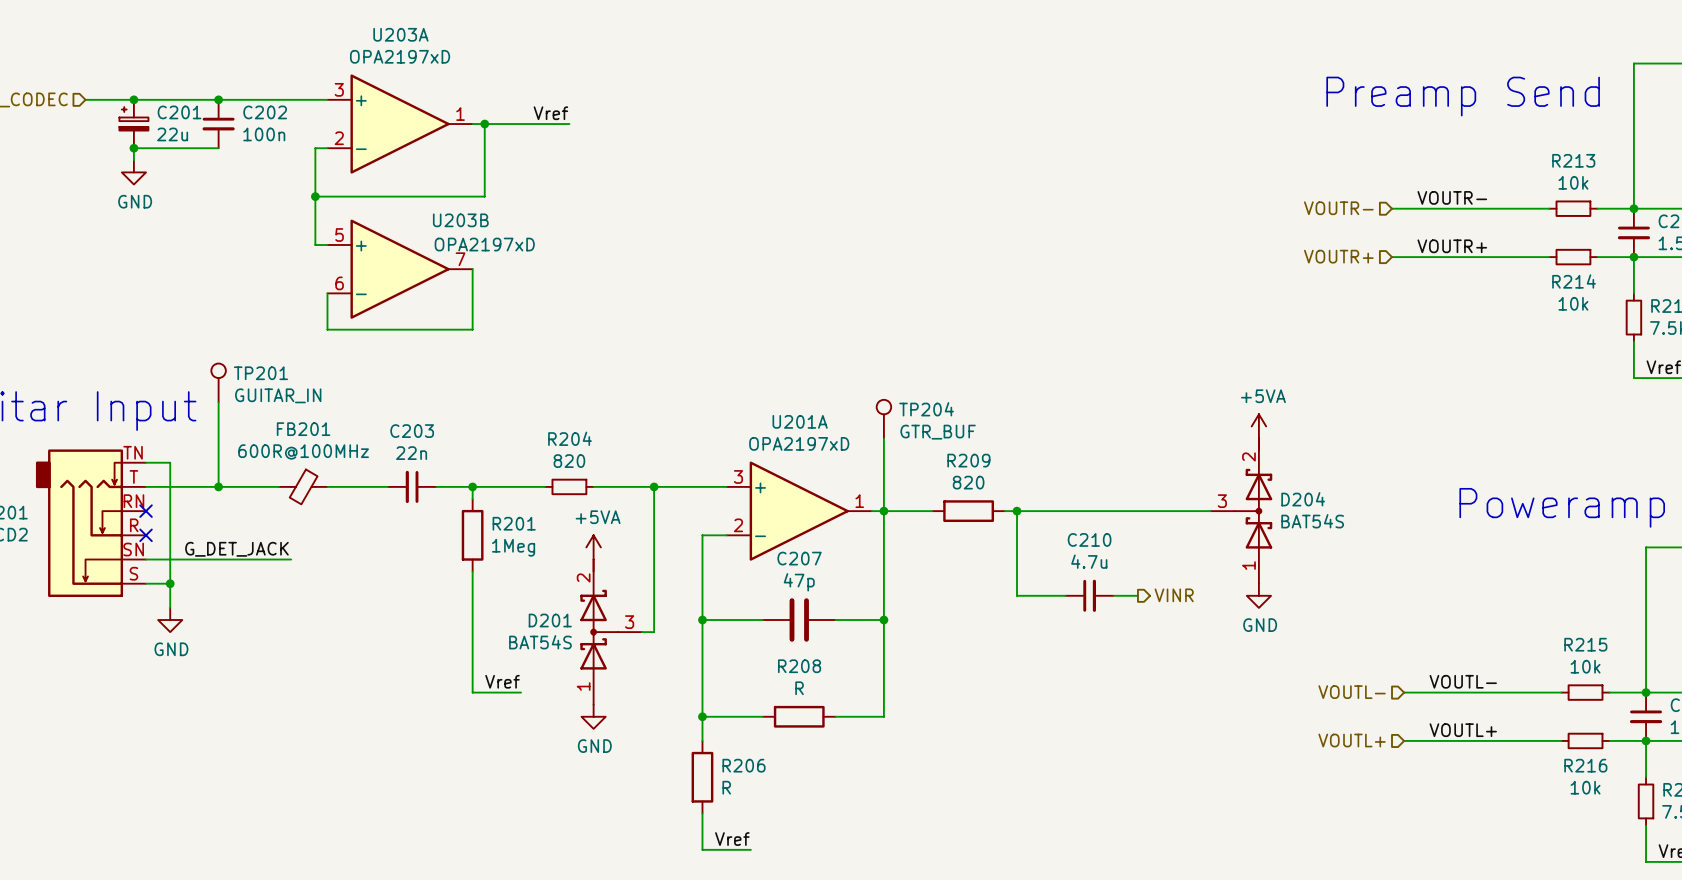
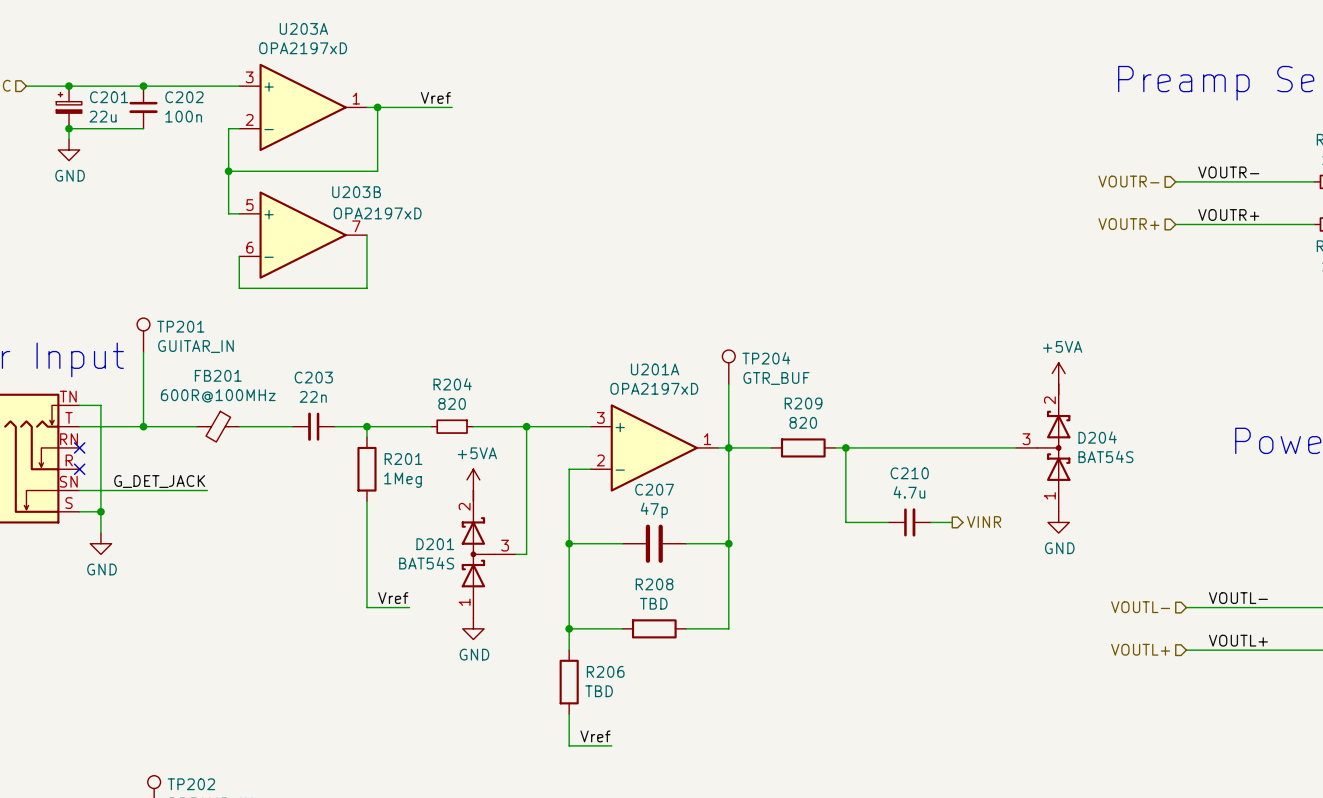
R208 value: R (799, 688) -> TBD (653, 603)
R206 value: R (726, 787) -> TBD (599, 691)

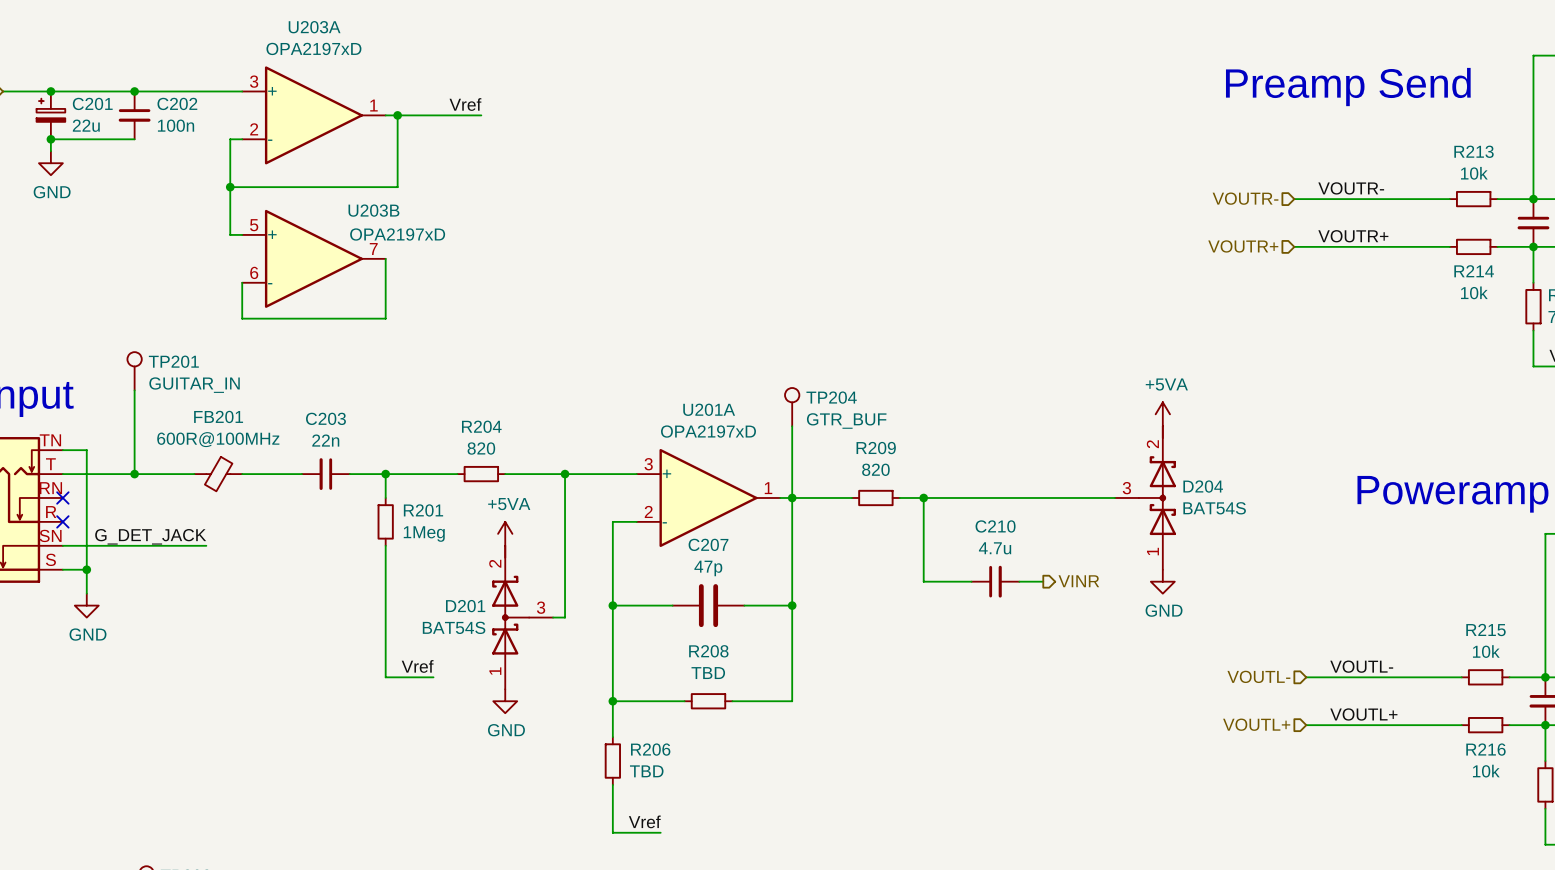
R201 symbol: [357, 437, 377, 502] -> [377, 497, 394, 546]
R209 symbol: [771, 438, 836, 458] -> [851, 489, 900, 507]
R208 symbol: [622, 619, 687, 639] -> [684, 693, 733, 710]
R206 symbol: [559, 650, 579, 715] -> [604, 737, 621, 785]

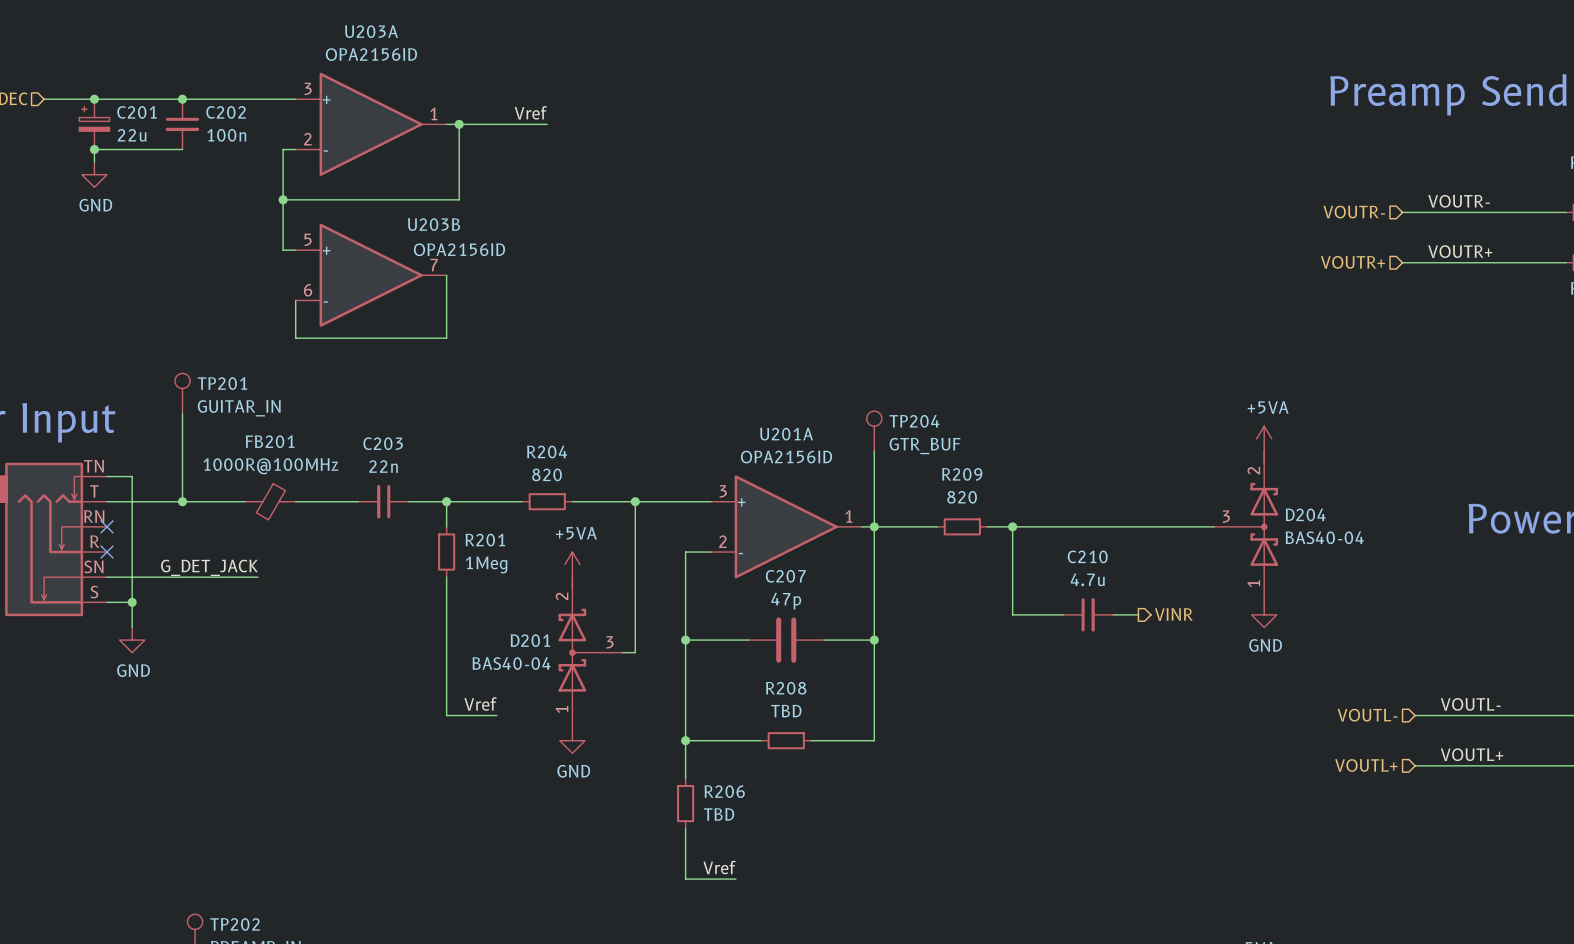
U203A value: OPA2197xD (313, 48) -> OPA2156ID (371, 54)
U203B value: OPA2197xD (397, 234) -> OPA2156ID (459, 249)
U201A value: OPA2197xD (708, 431) -> OPA2156ID (786, 457)
FB201 value: 600R@100MHz (218, 439) -> 1000R@100MHz (270, 466)
D204 value: BAT54S (1214, 508) -> BAS40-04 (1324, 537)
D201 value: BAT54S (454, 627) -> BAS40-04 (511, 663)

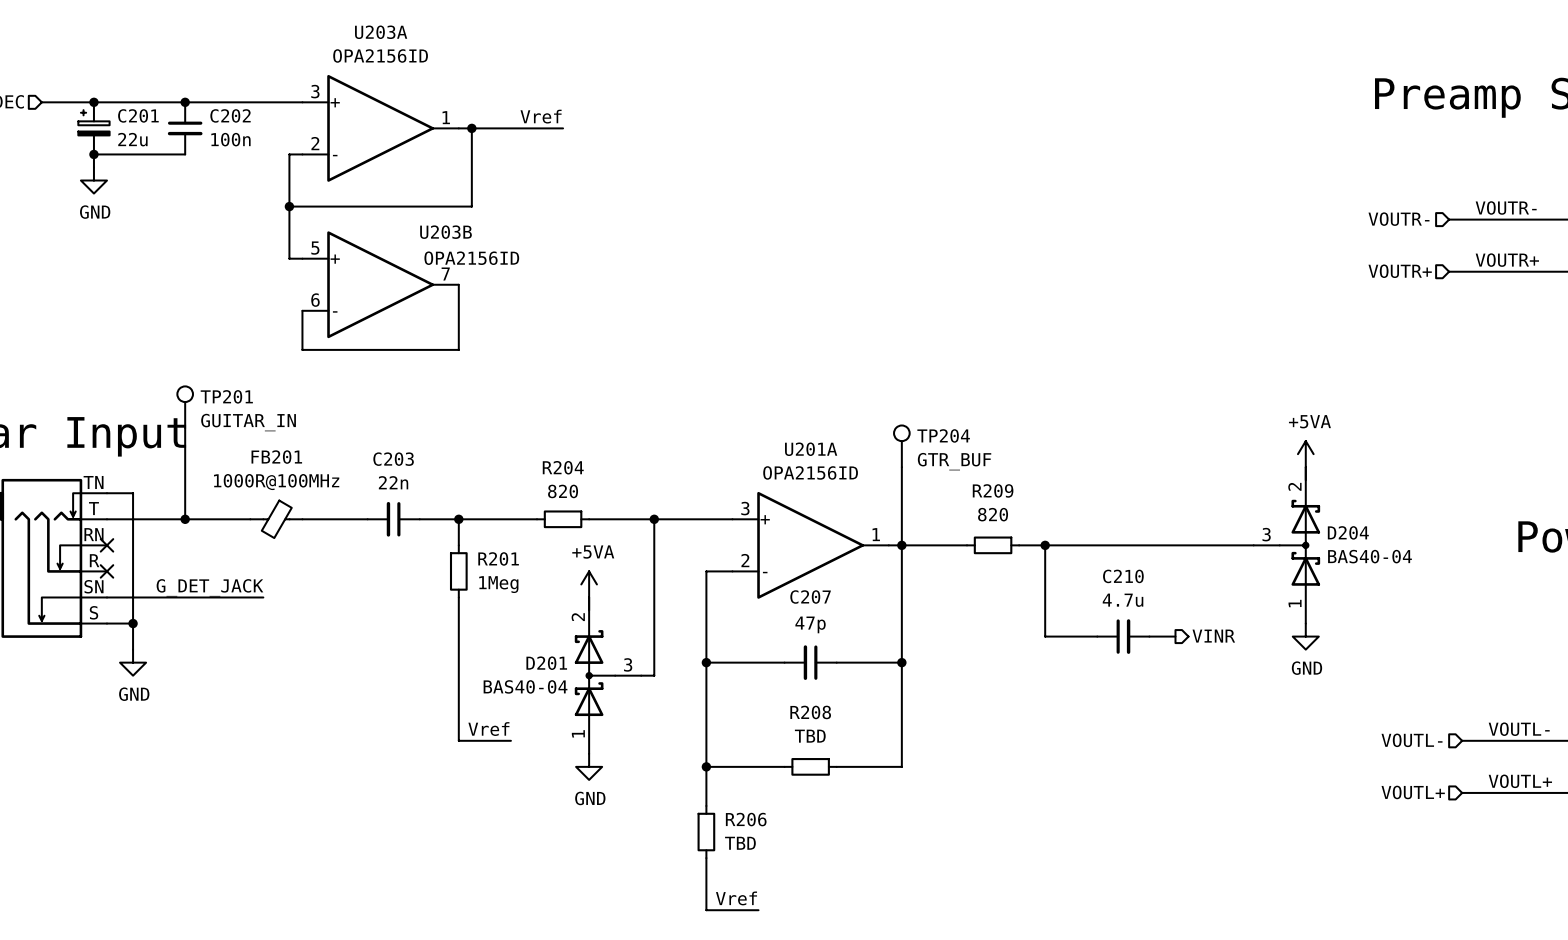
C207 symbol: [748, 617, 824, 663] -> [784, 645, 837, 680]

